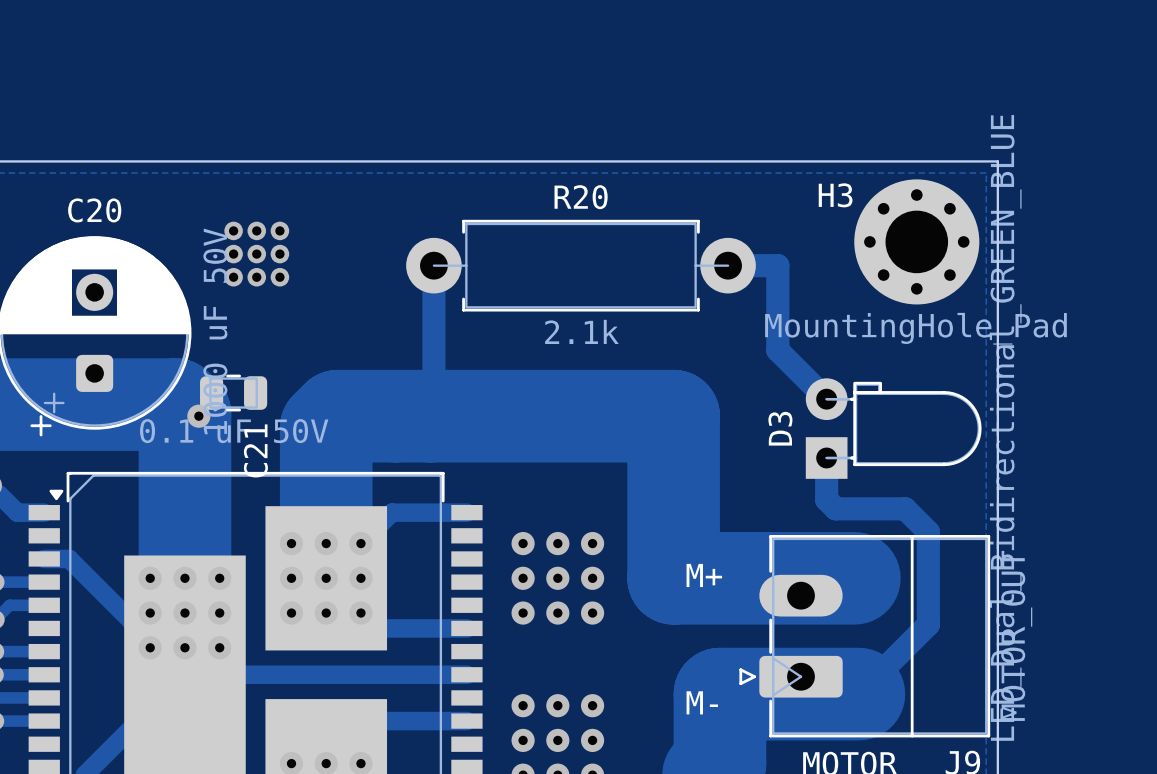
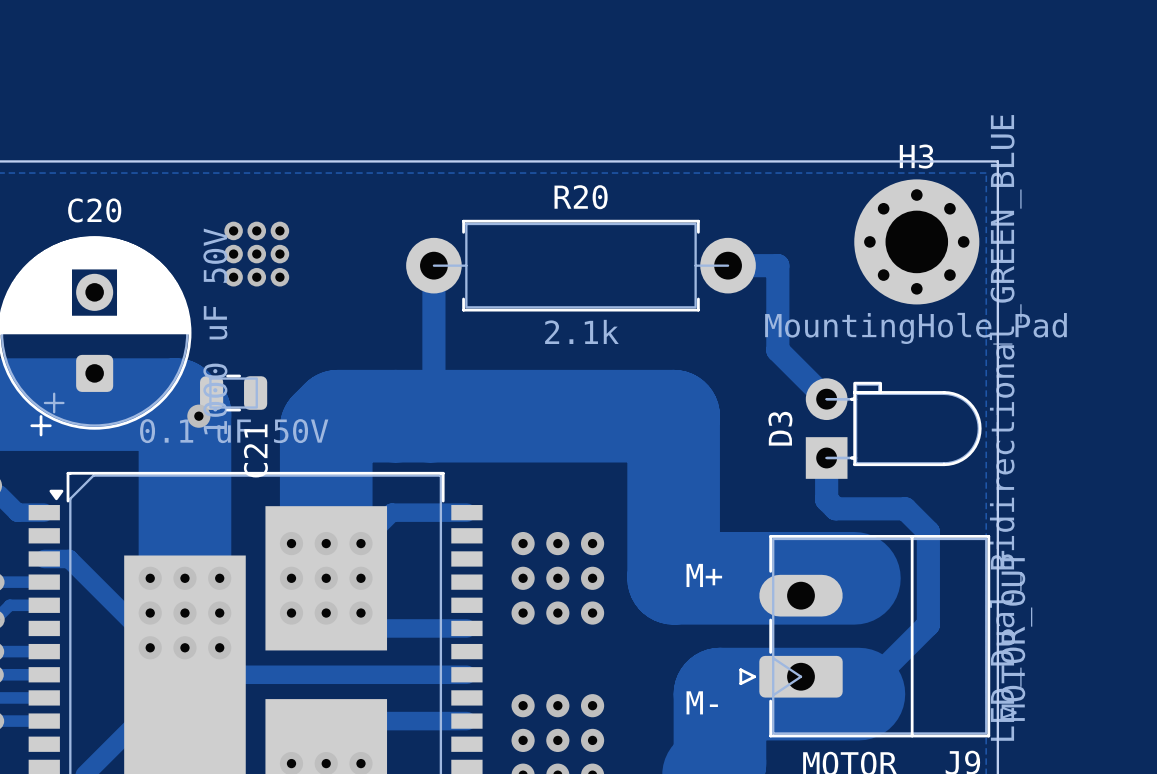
H3 name position: H3 (835, 195) -> H3 (916, 156)

